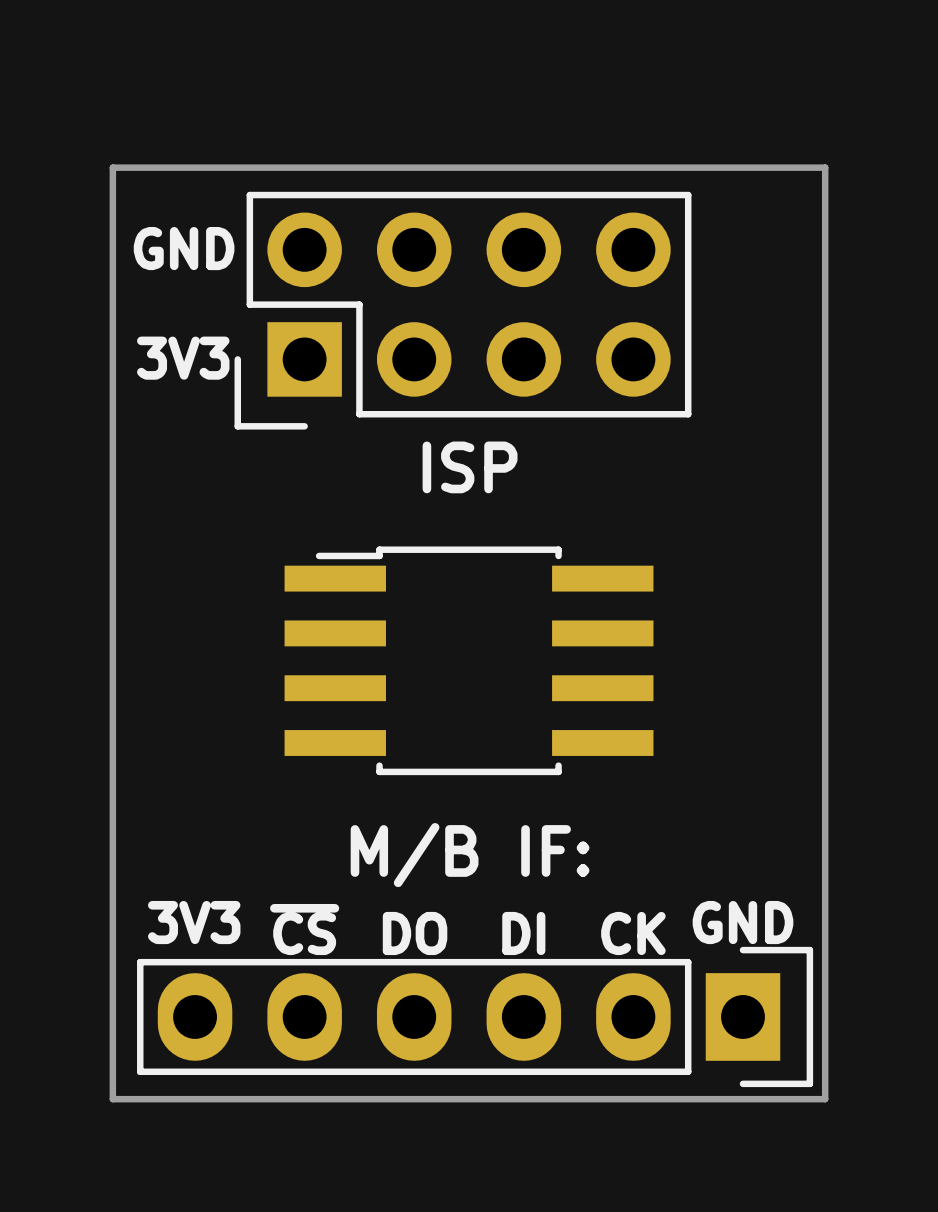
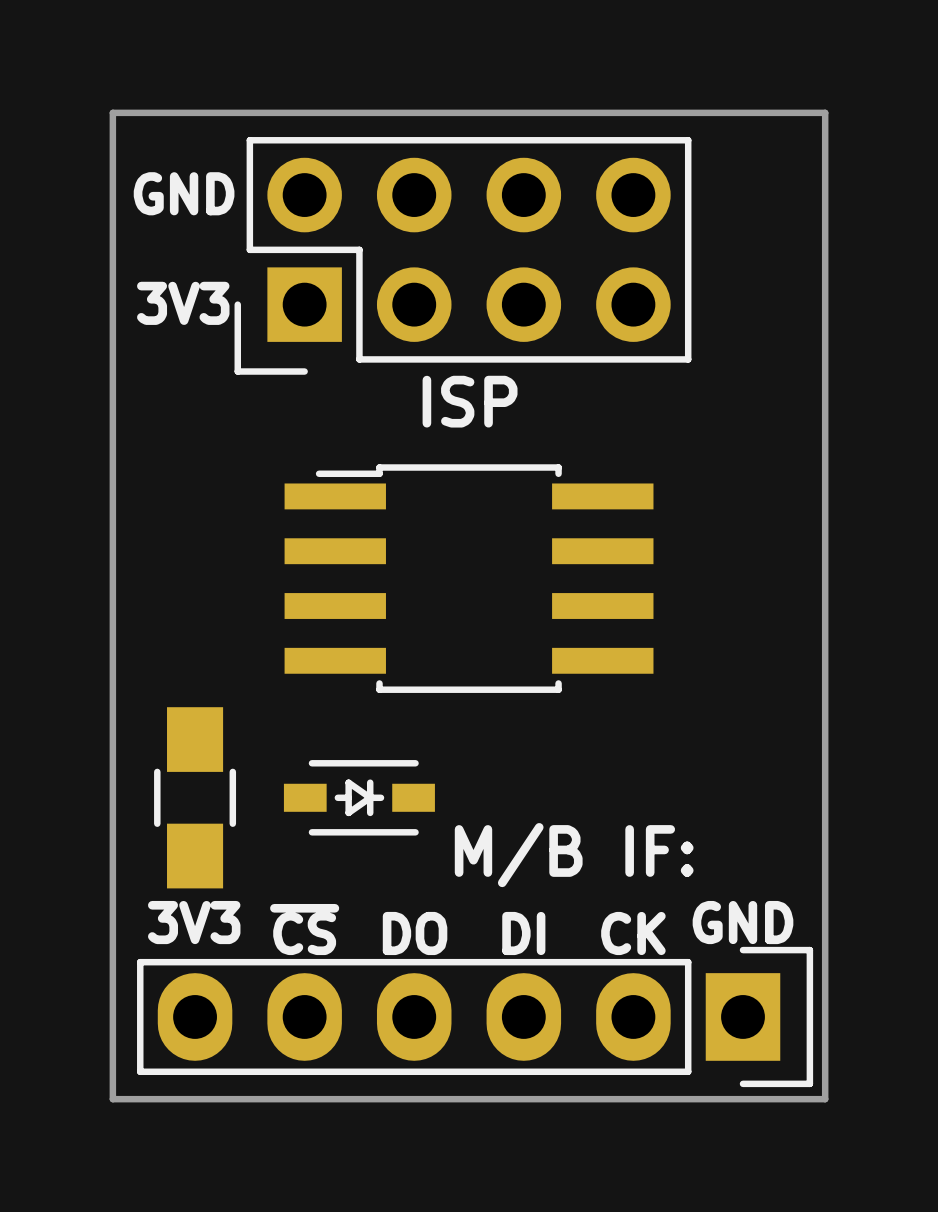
board edge: (112, 167) (825, 167) -> (112, 167) (112, 112) (825, 112) (825, 167)
text position: GND (184, 248) -> GND (184, 193)
part position: (462, 310) -> (462, 255)
text position: 3V3 (183, 358) -> 3V3 (183, 303)
text position: ISP (470, 467) -> ISP (470, 401)
part position: (469, 660) -> (469, 578)
part: none -> (195, 797)
part: none -> (359, 797)
text position: M/B IF: (470, 855) -> M/B IF: (574, 855)

